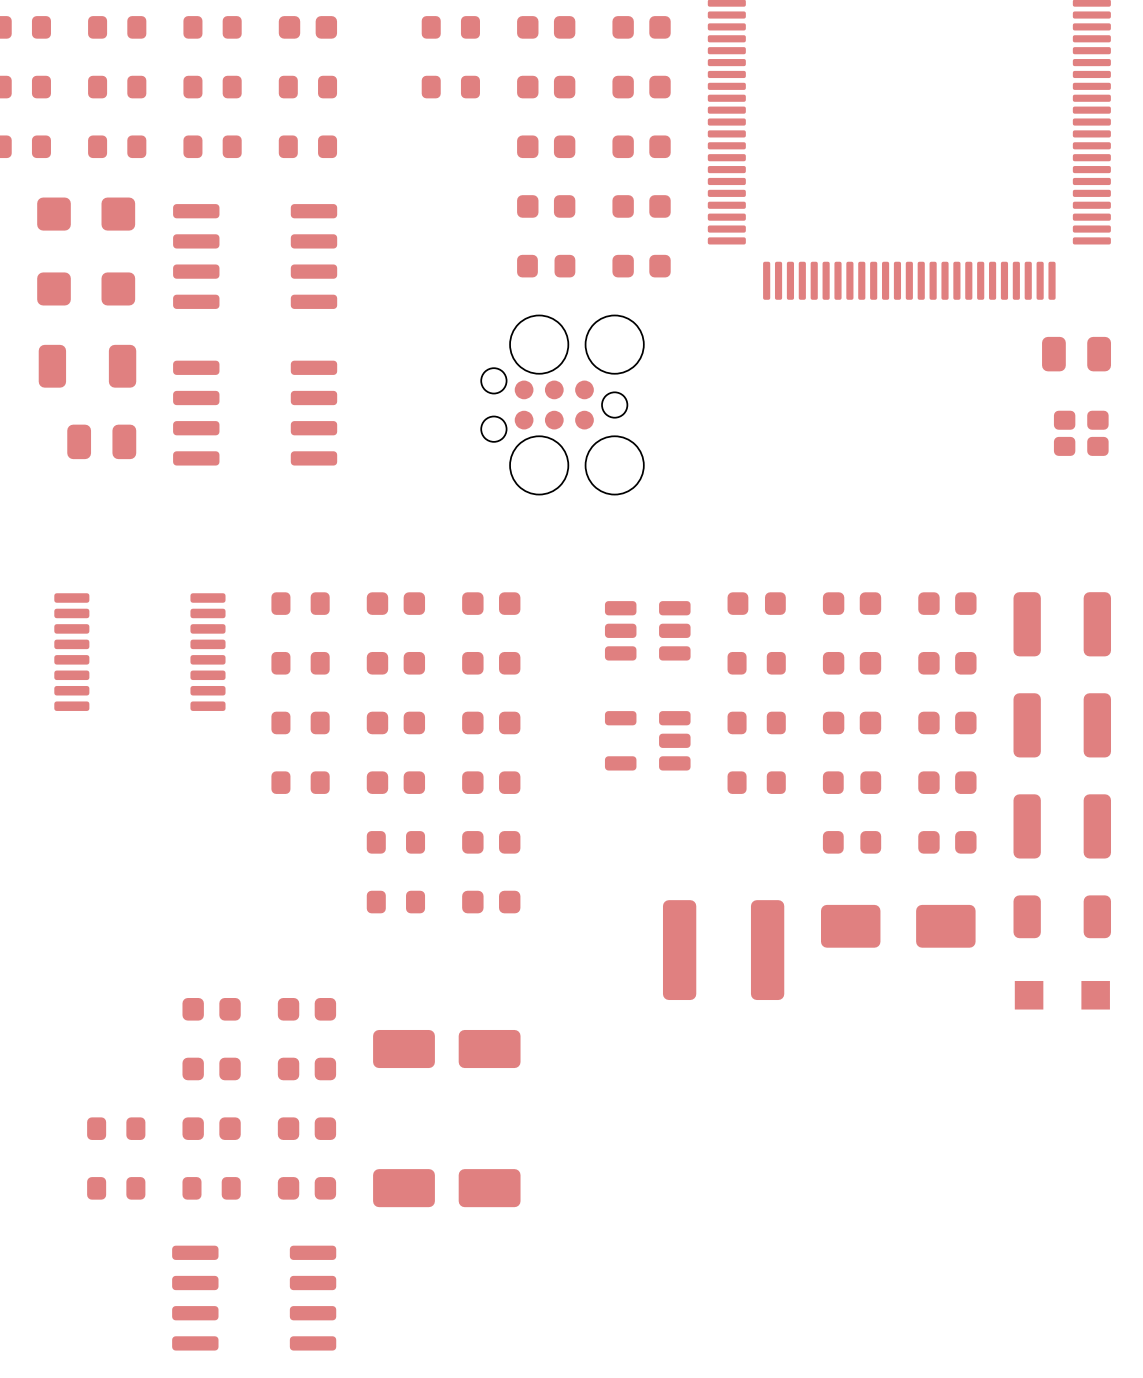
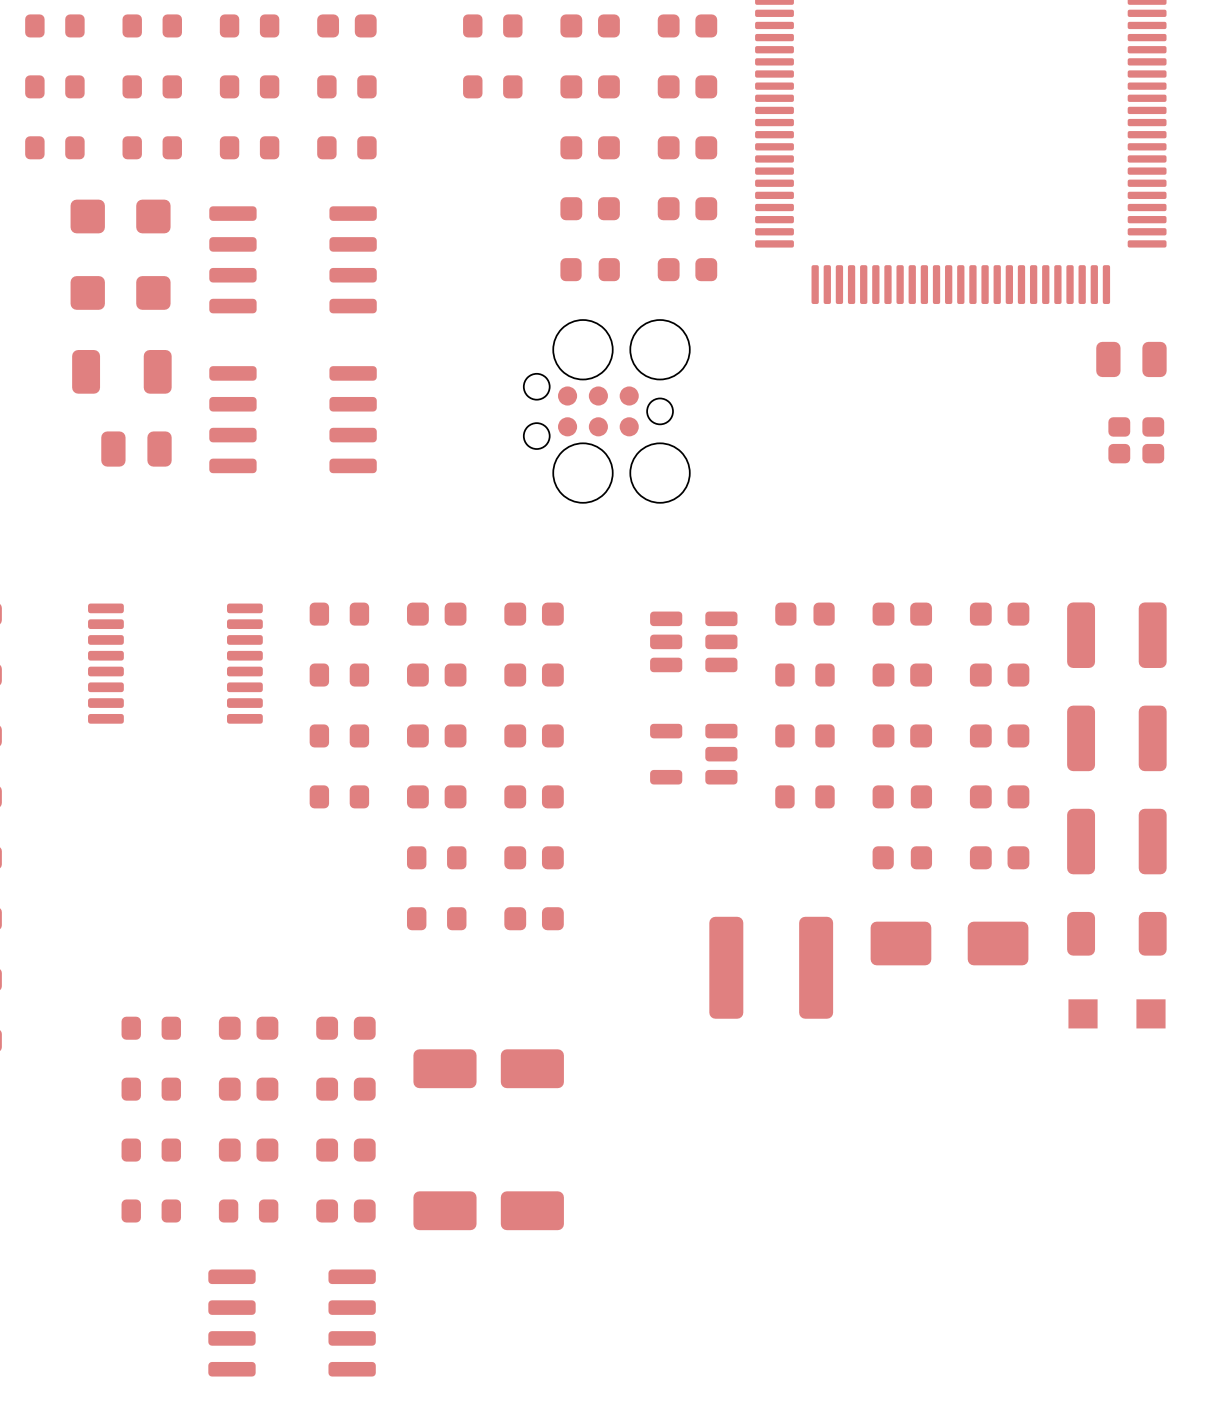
part: none -> (151, 1028)
part: none -> (151, 1089)

